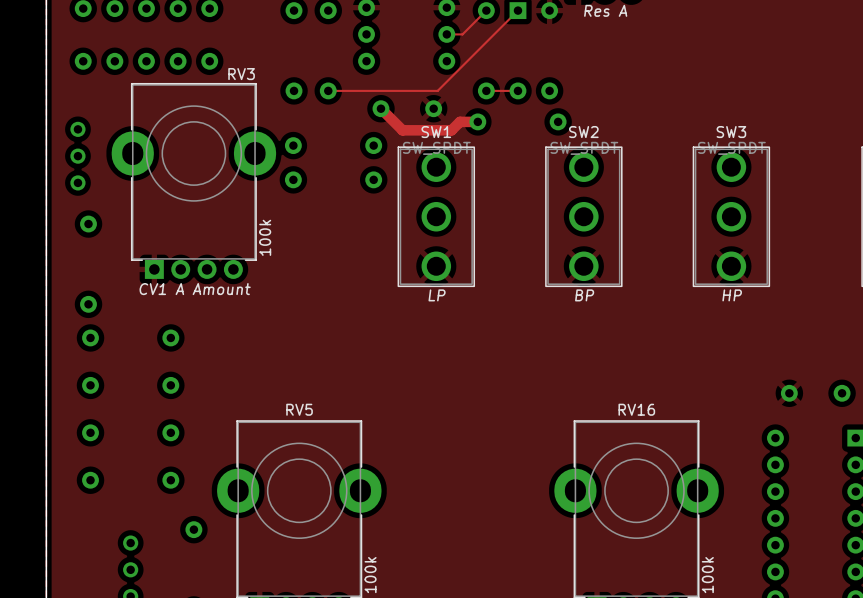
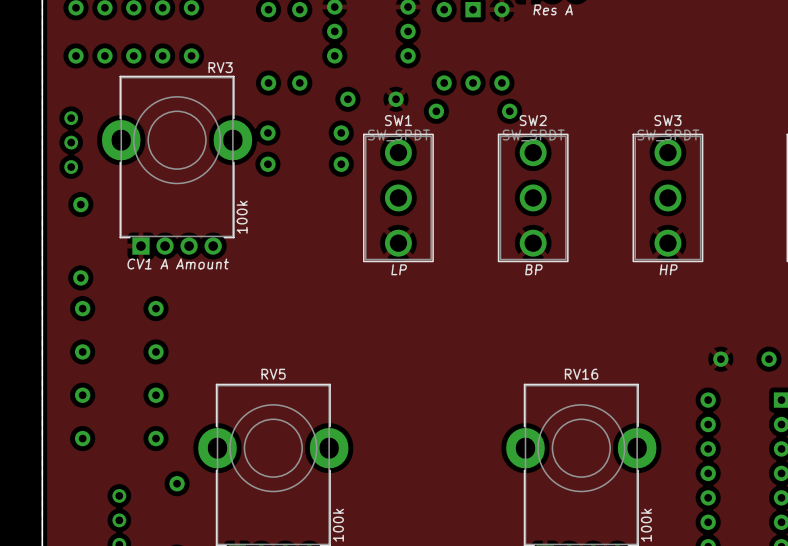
track: (486, 10) (462, 34) (446, 34) -> none
track: (517, 10) (437, 90) (328, 90) -> none
track: (486, 90) (517, 90) -> none
track: (380, 108) (402, 130) (451, 130) (460, 121) (477, 121) -> none

